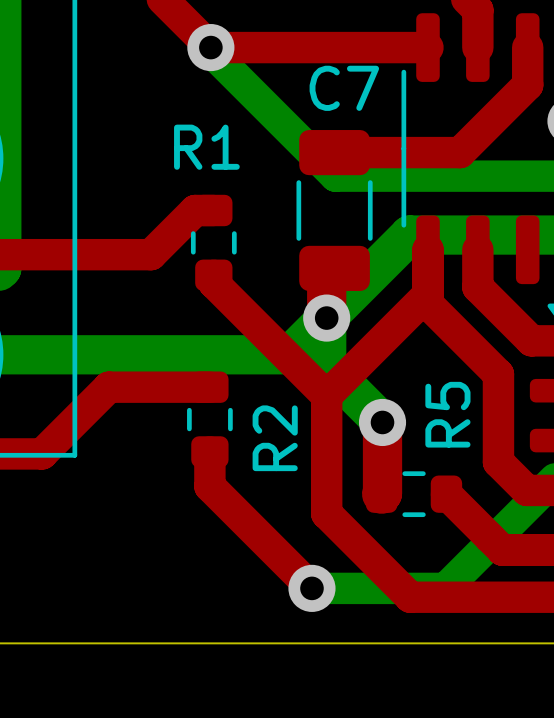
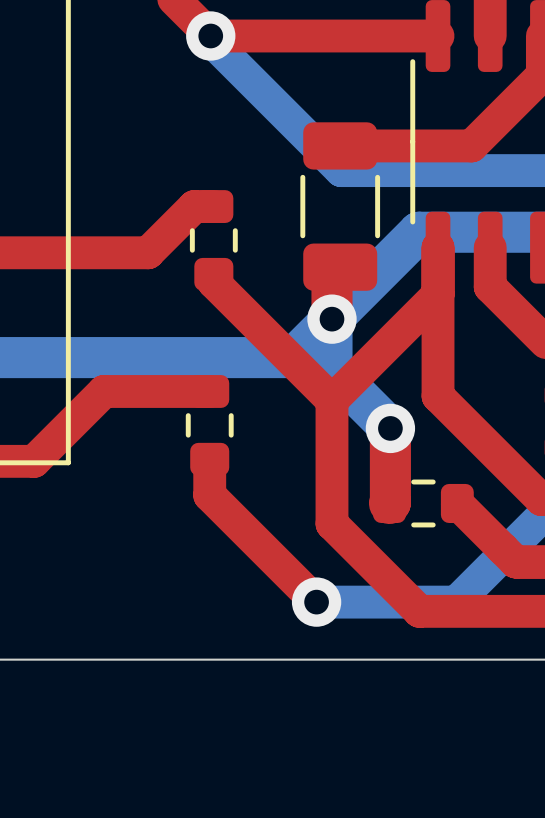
C7 name: C7 (344, 88) -> none
R1 name: R1 (206, 147) -> none
top track: (427, 303) (498, 374) (498, 462) -> (438, 304) (438, 396) (511, 469)
R5 name: R5 (447, 414) -> none
R2 name: R2 (275, 438) -> none

